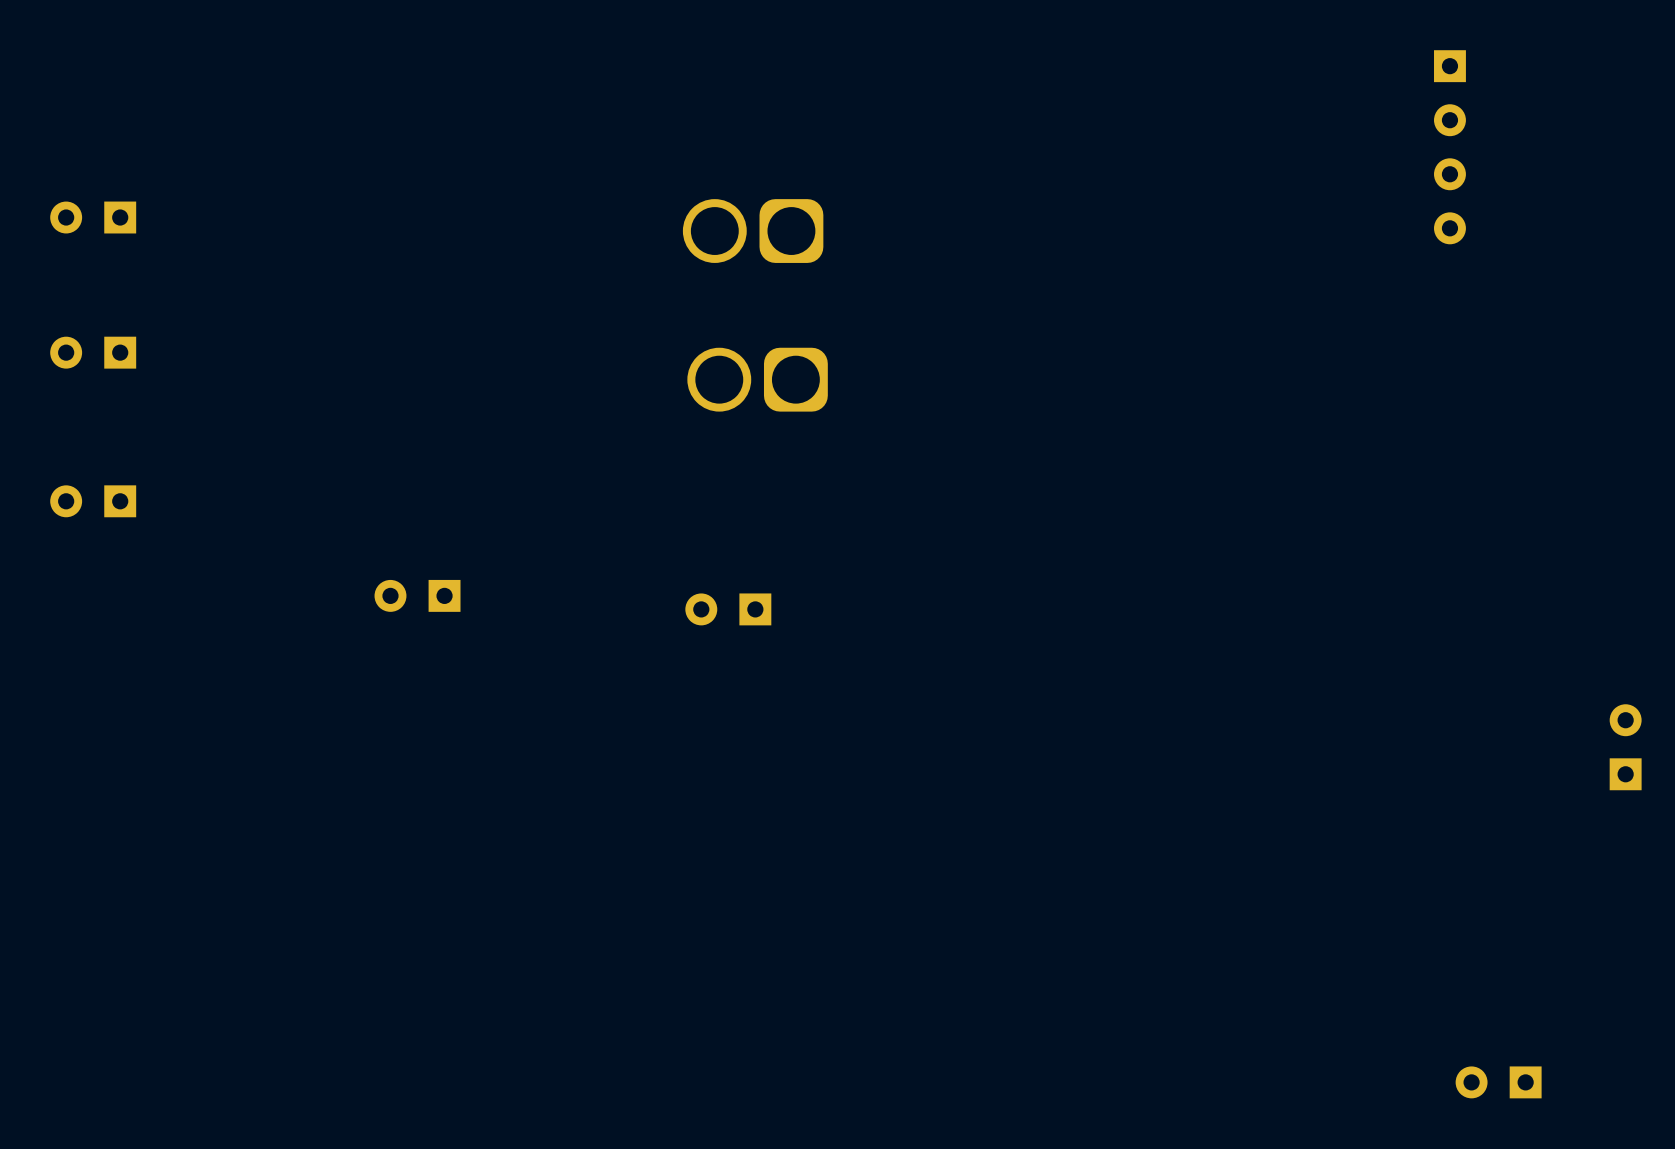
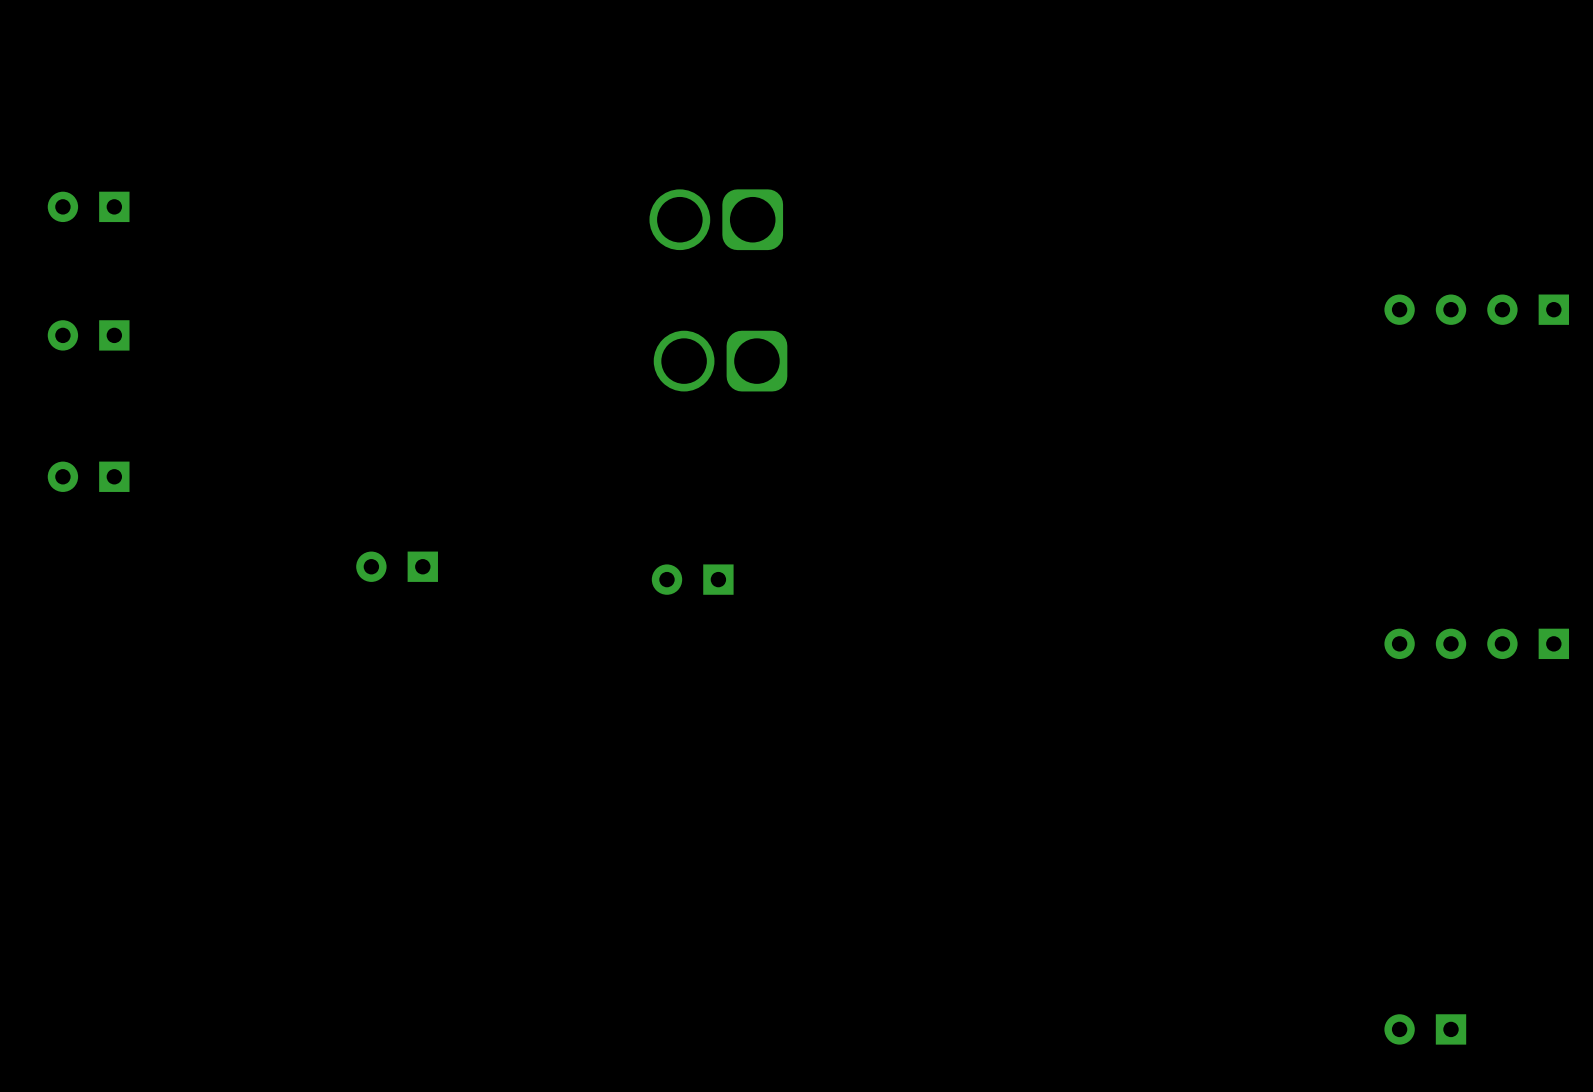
part rotation: 0° (1449, 147) -> 90° clockwise (1476, 309)
part position: (1449, 147) -> (1476, 309)
part: none -> (1476, 643)
part: (1625, 747) -> none

